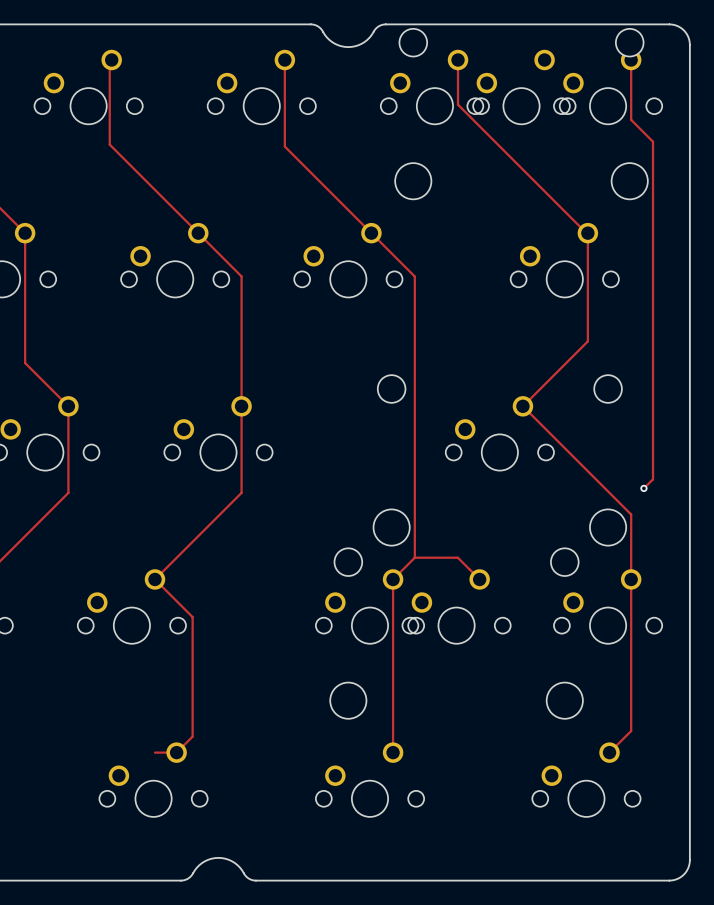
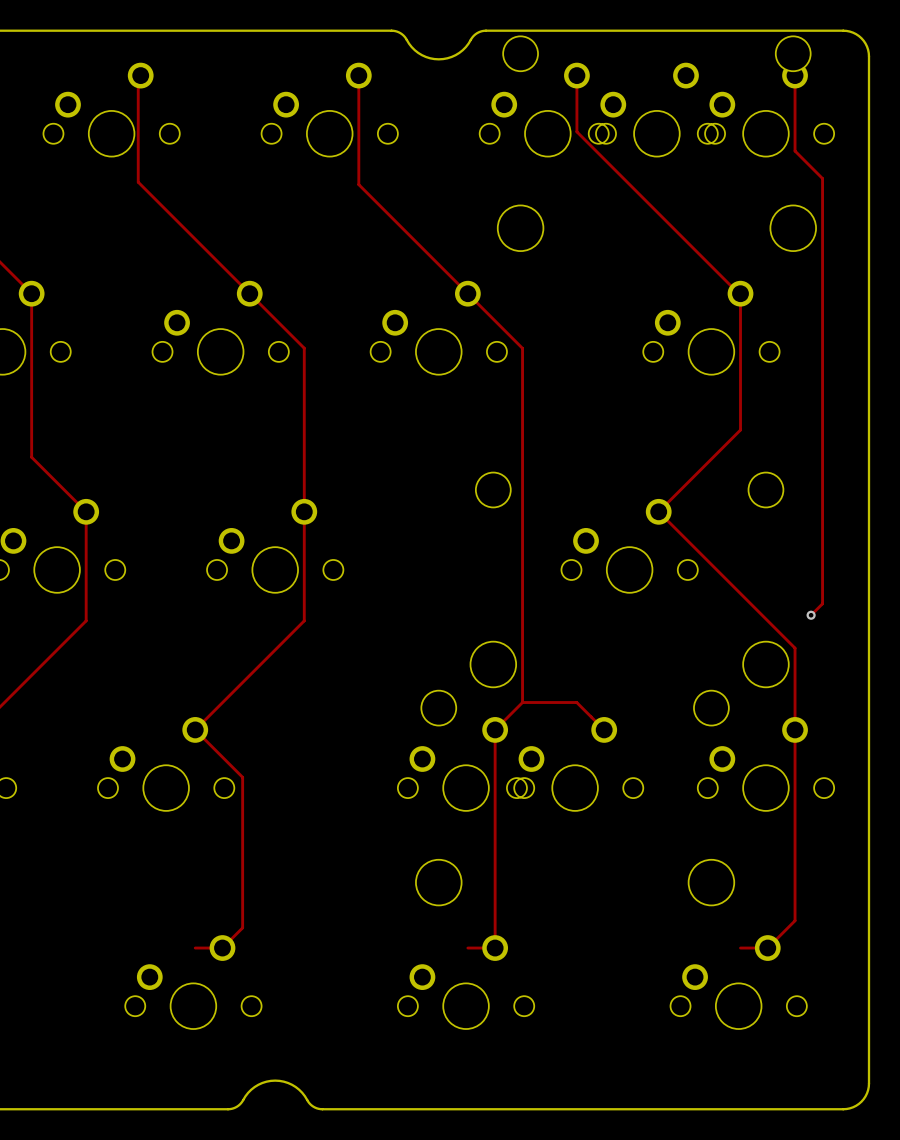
track: none -> (467, 948) (495, 948)
track: none -> (740, 948) (767, 948)

